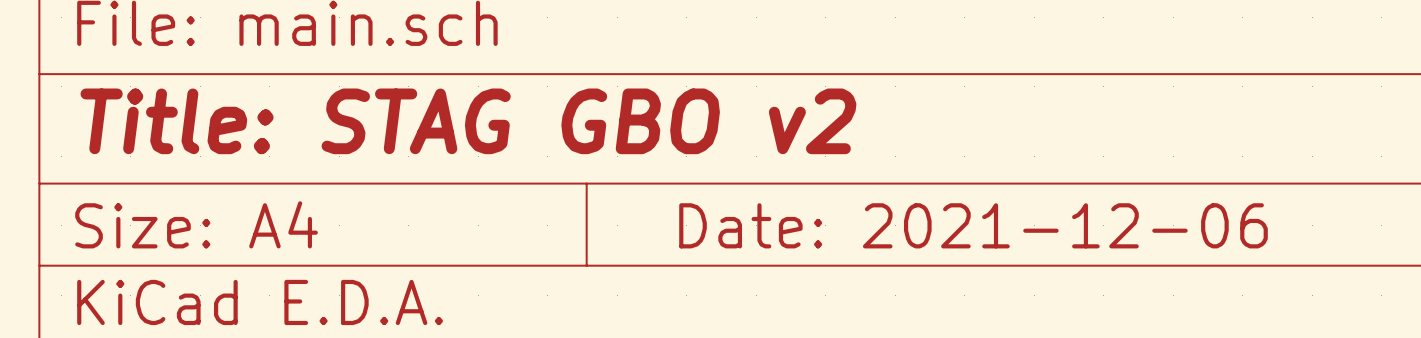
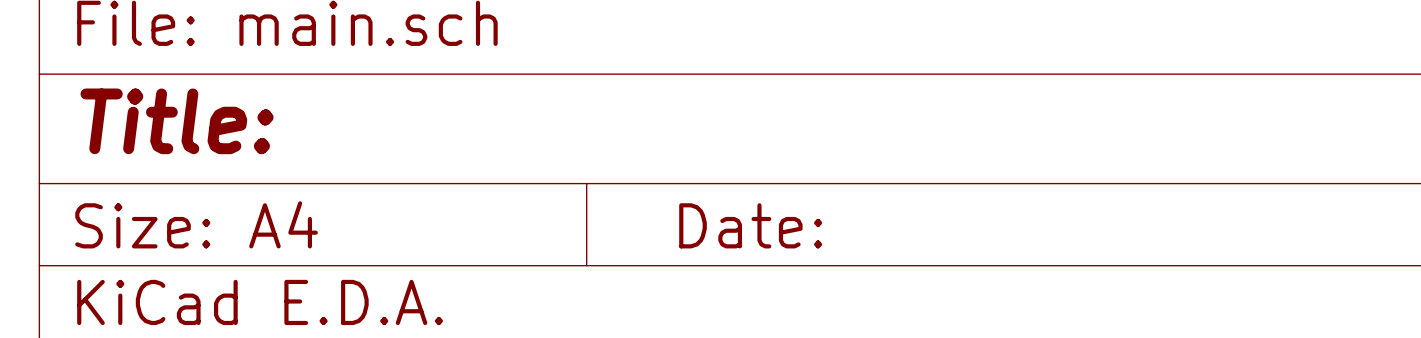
title block: Title: STAG GBO v2 (468, 121) -> Title: (177, 121)
title block: Date: 2021-12-06 (973, 225) -> Date: (750, 225)

